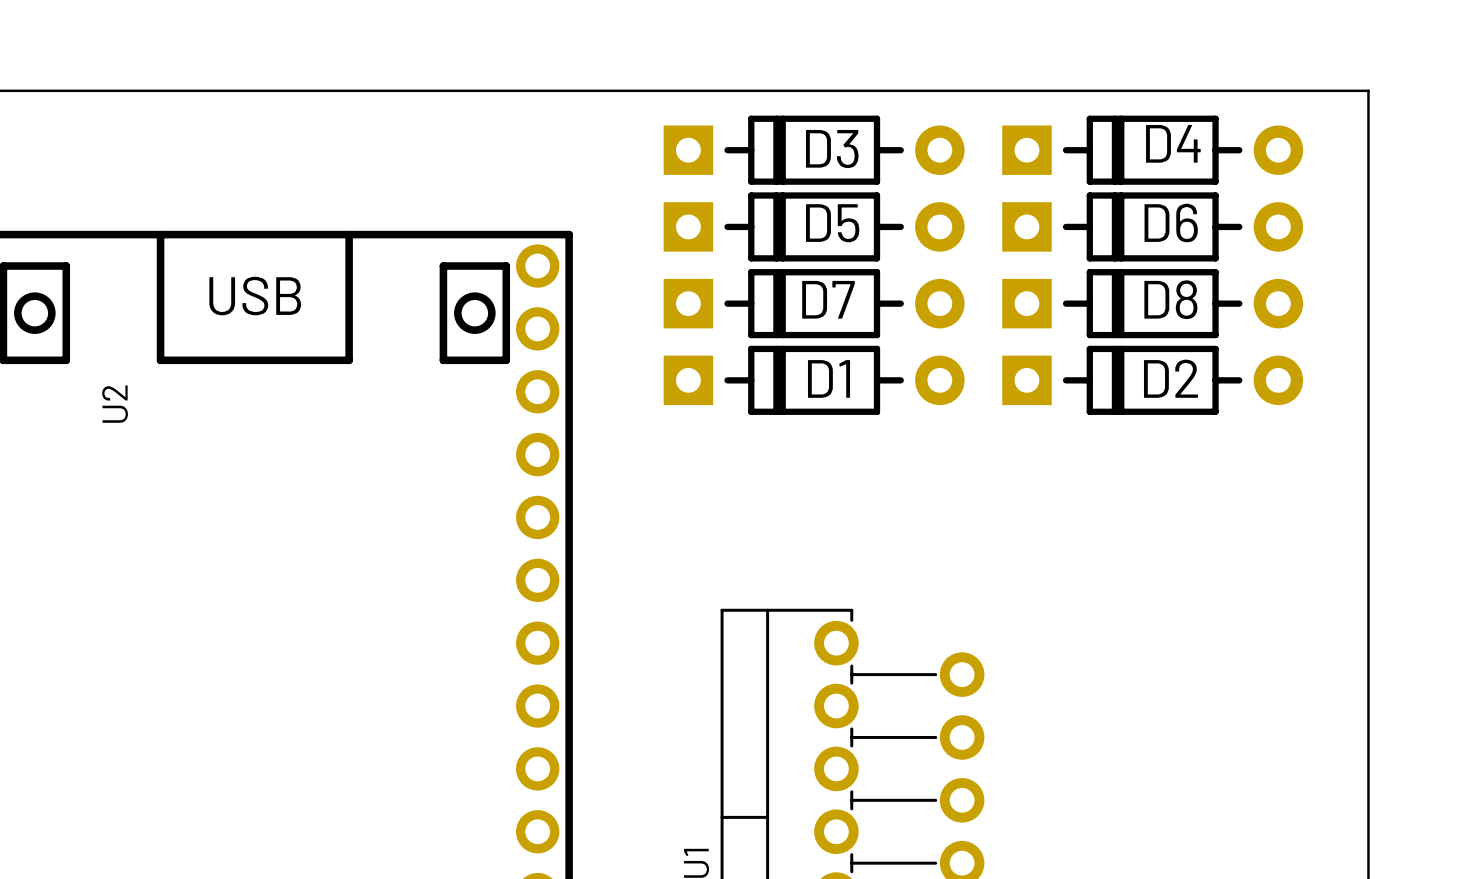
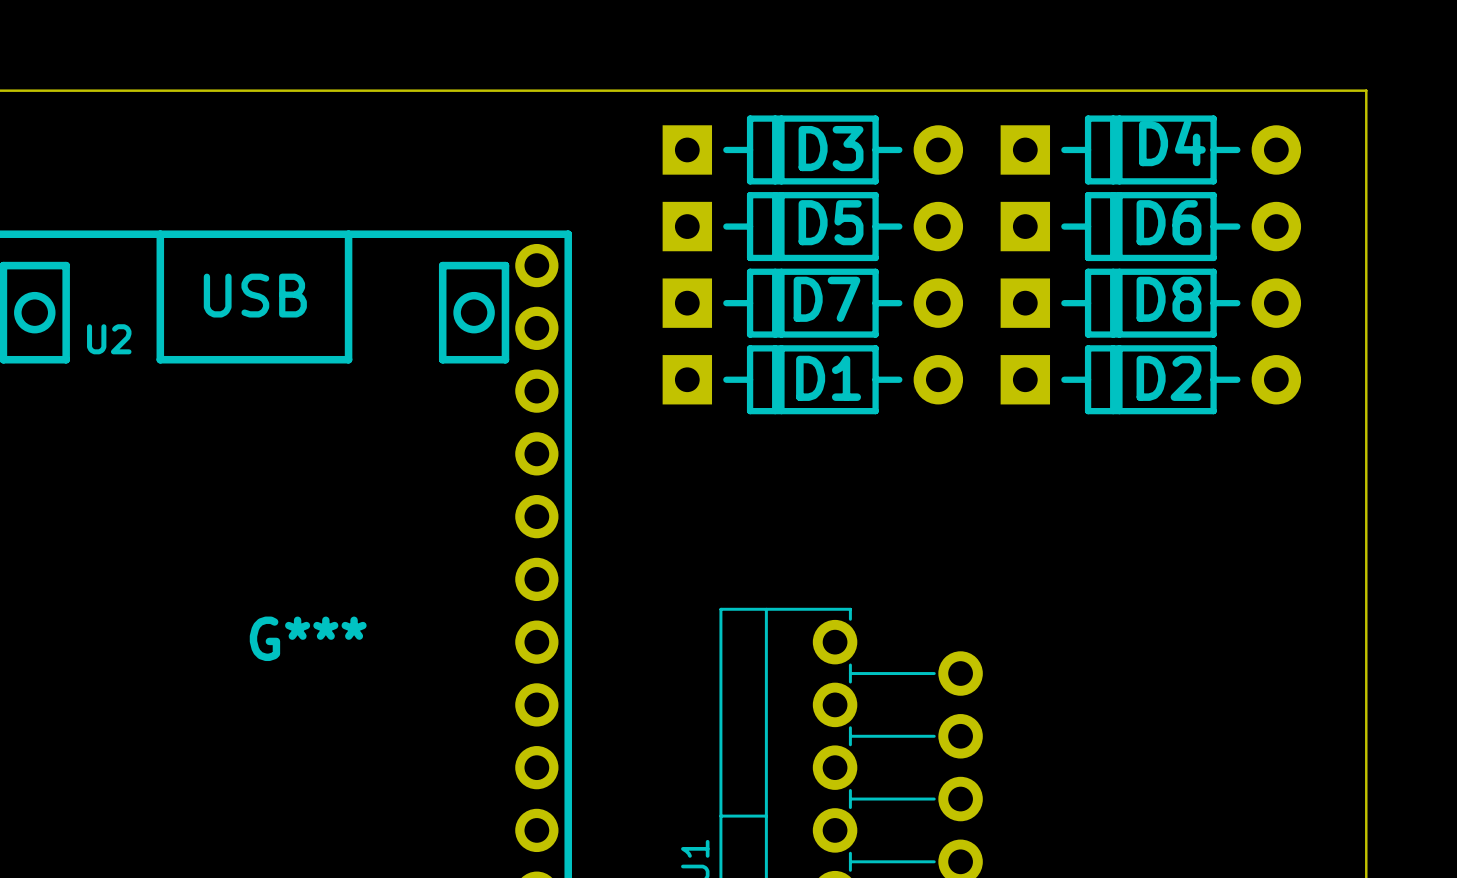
U2 name rotation: 0° (115, 404) -> 90° clockwise (109, 339)
U2 name position: U2 (115, 404) -> U2 (109, 339)
G***: none -> (308, 638)

